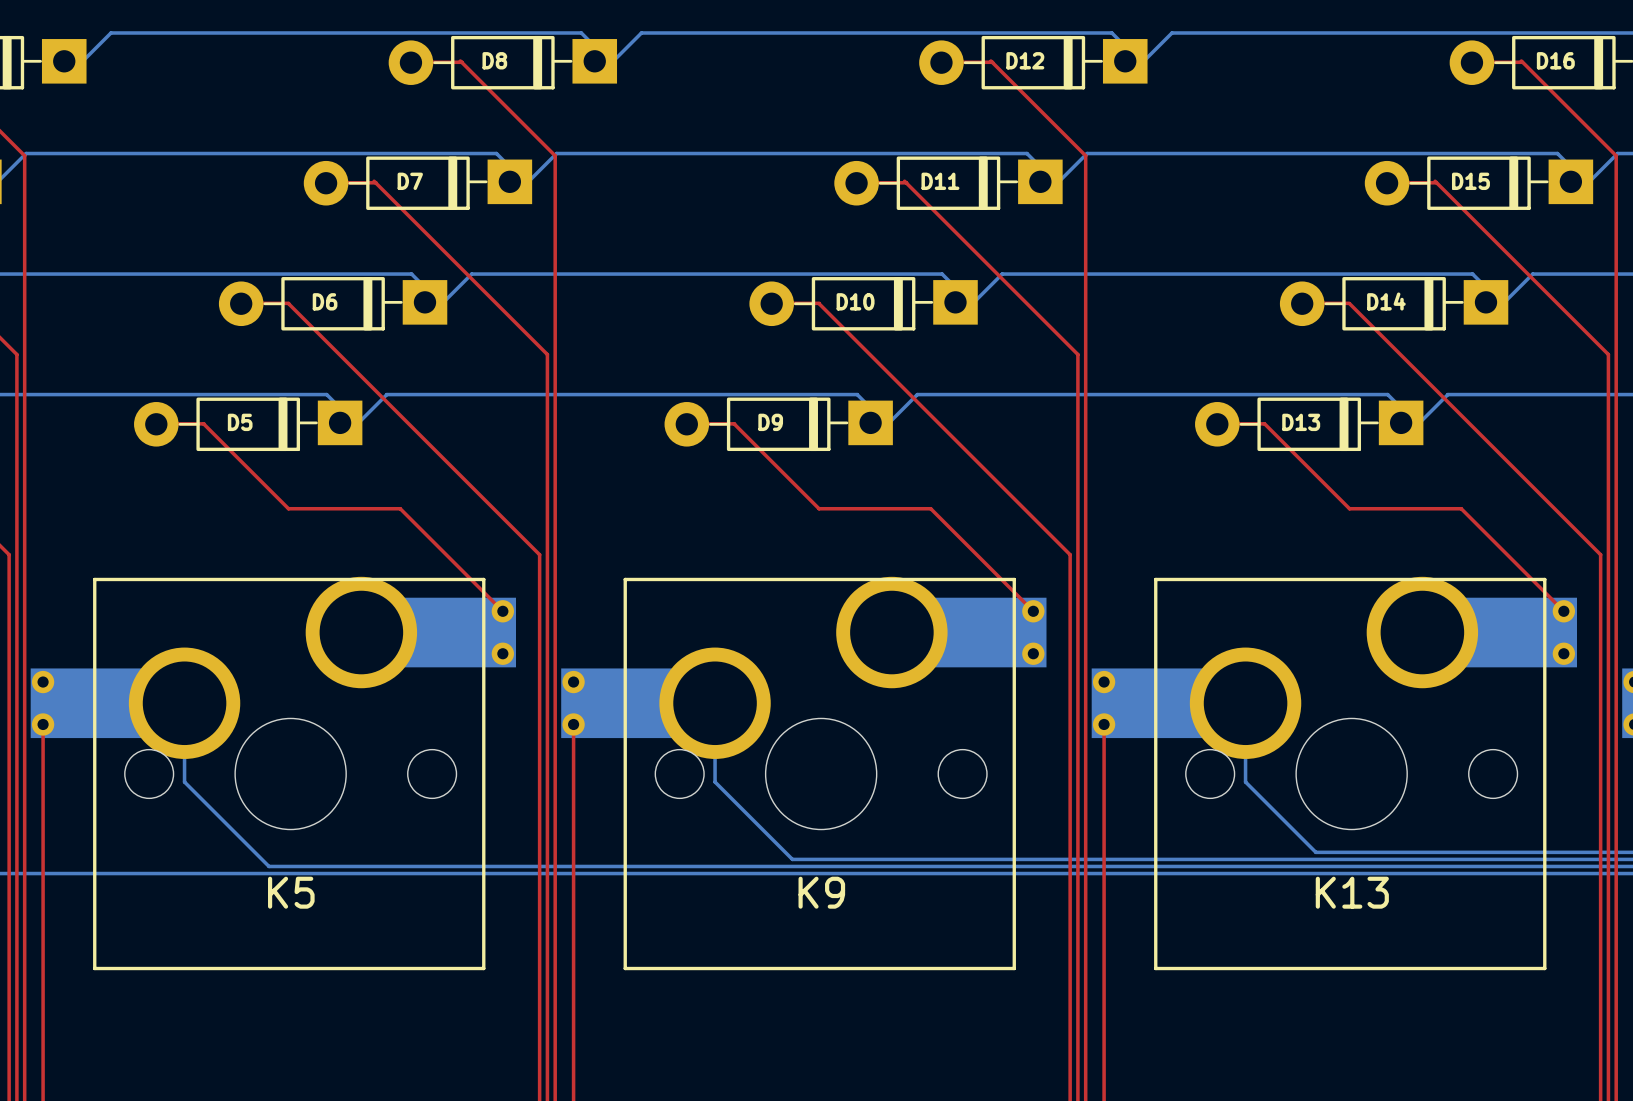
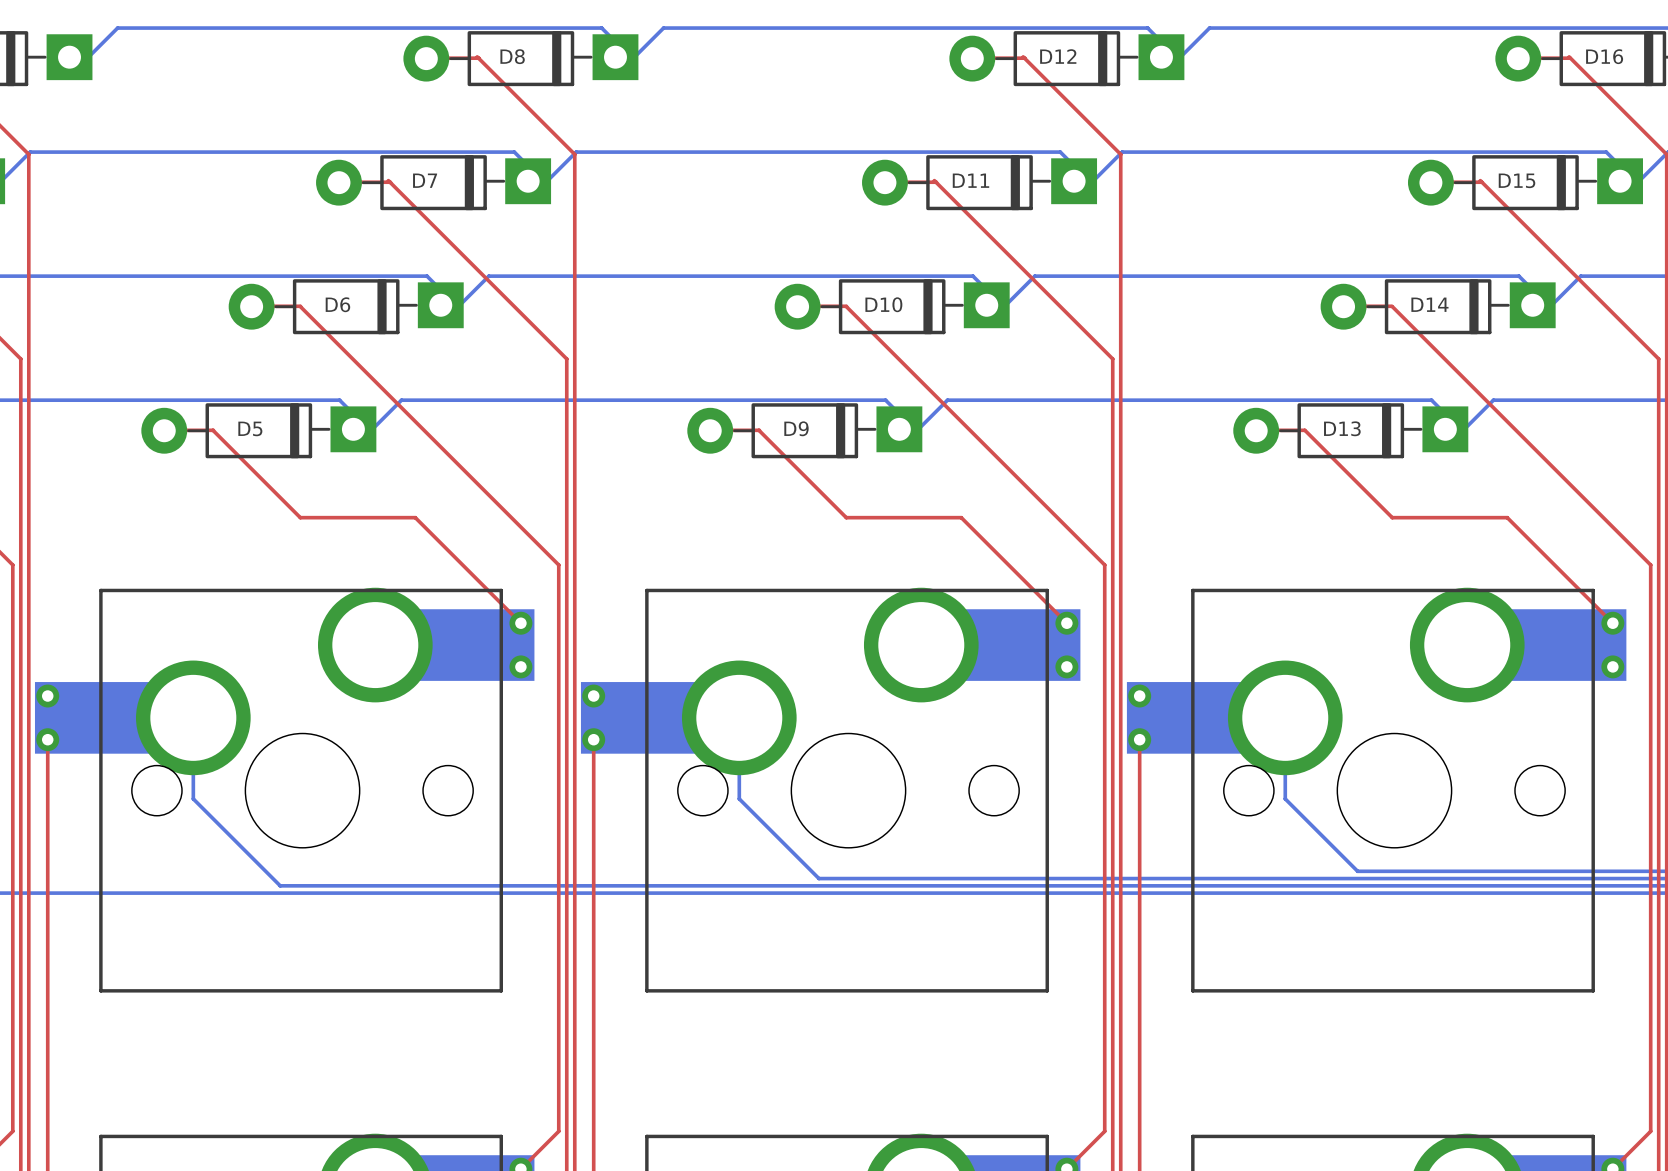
K5 name: K5 (291, 892) -> none
K9 name: K9 (821, 892) -> none
K13 name: K13 (1352, 892) -> none

